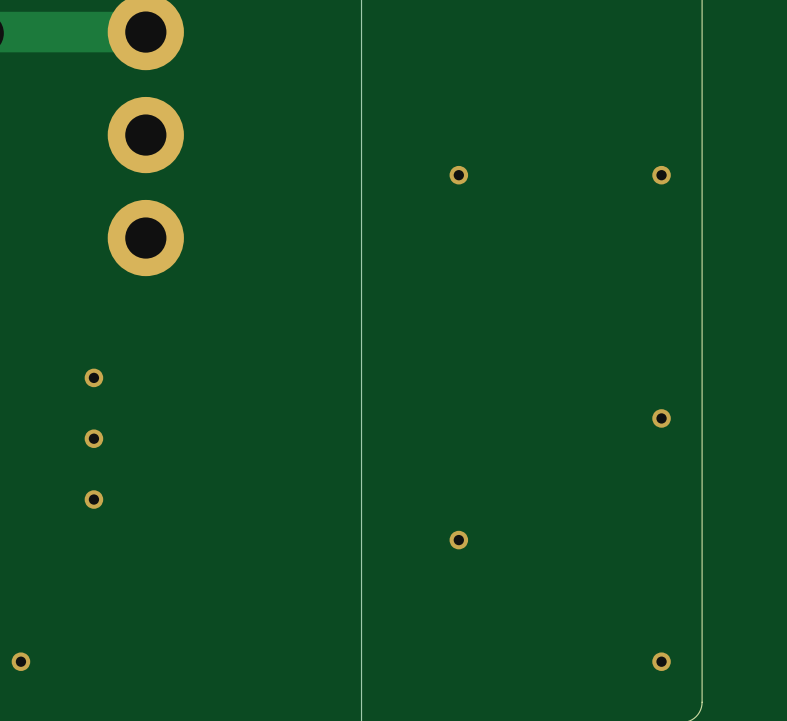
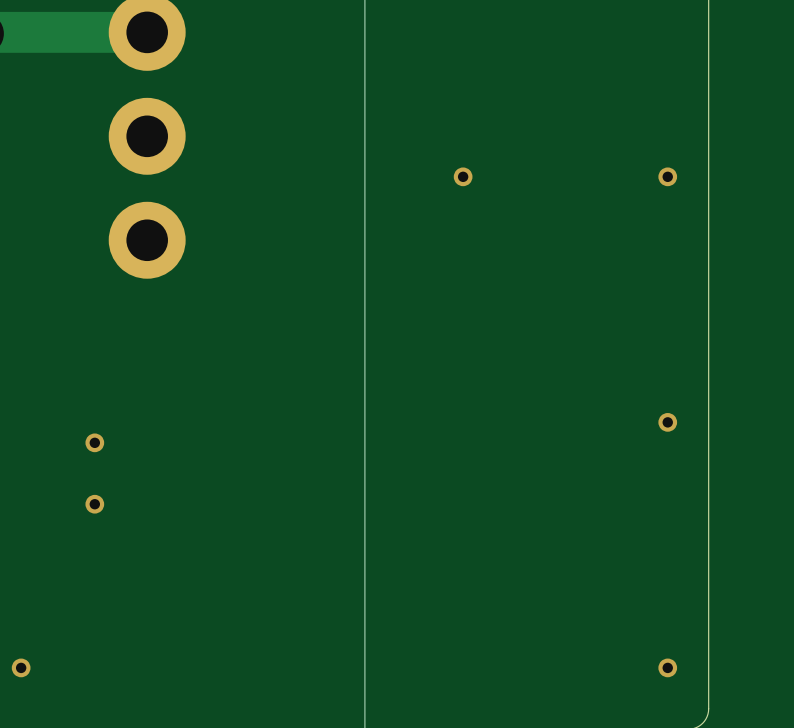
via: (93, 377) -> none
via: (458, 540) -> none

